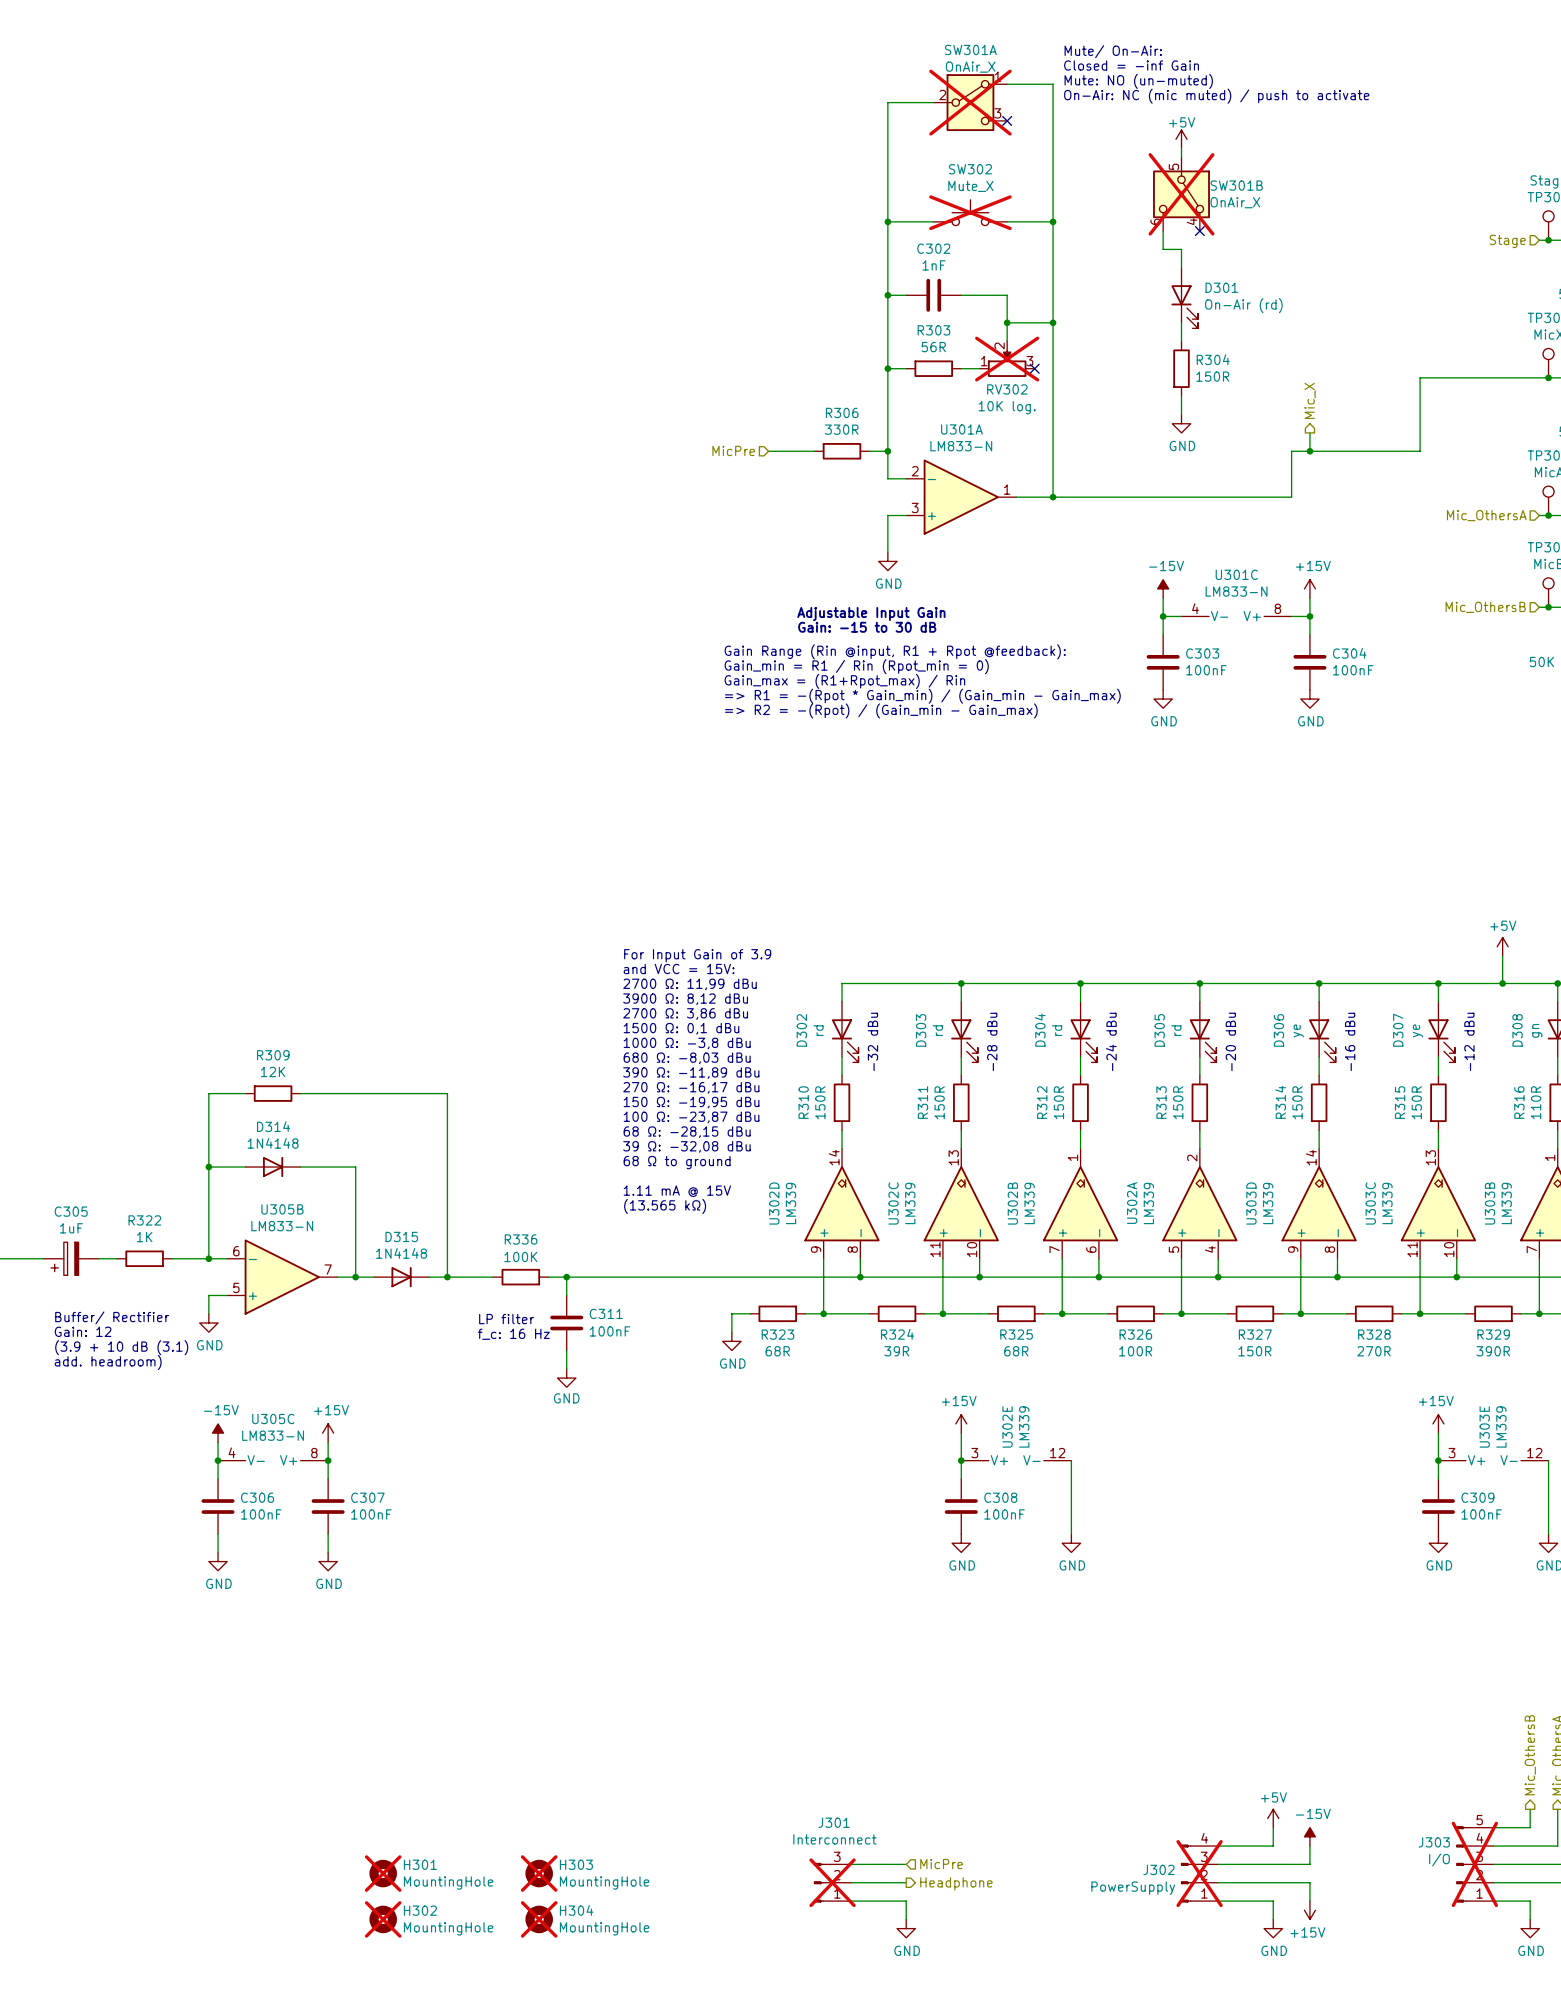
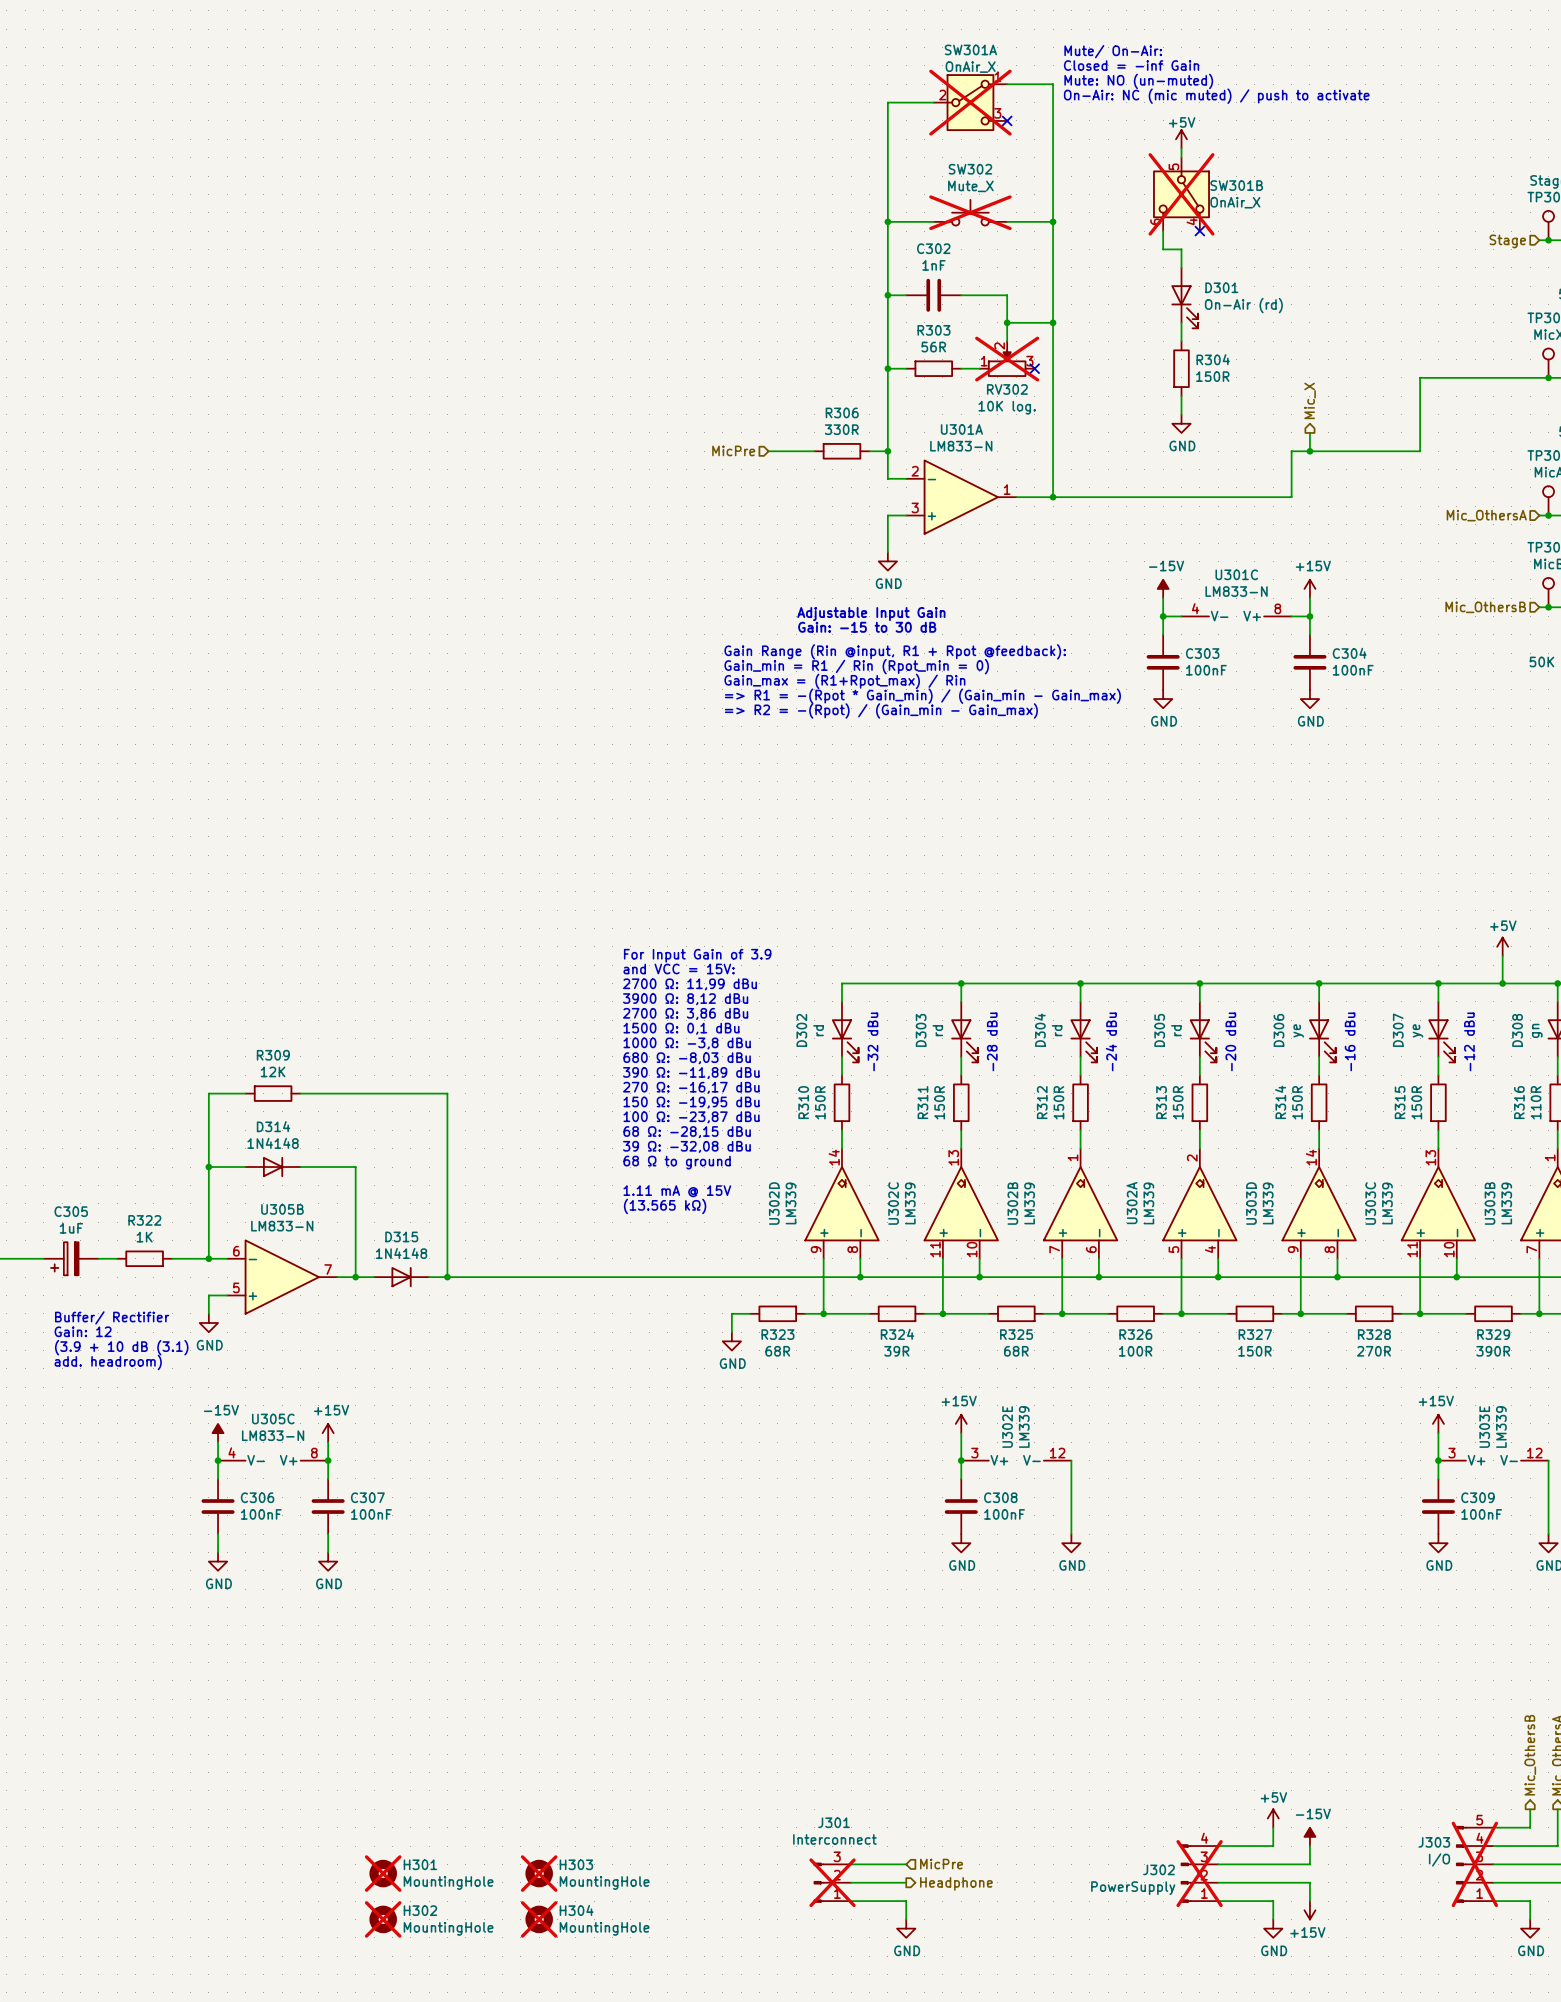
wire: none -> (493, 1277) (548, 1277)
R336: 100K (520, 1277) -> none
wire: (566, 1277) (566, 1295) -> none
junction: (566, 1277) -> none
text: LP filter (506, 1319) -> none
C311: 100nF (566, 1323) -> none
text: f_c: 16 Hz (513, 1334) -> none
wire: (566, 1350) (566, 1368) -> none
power symbol: GND (566, 1378) -> none

